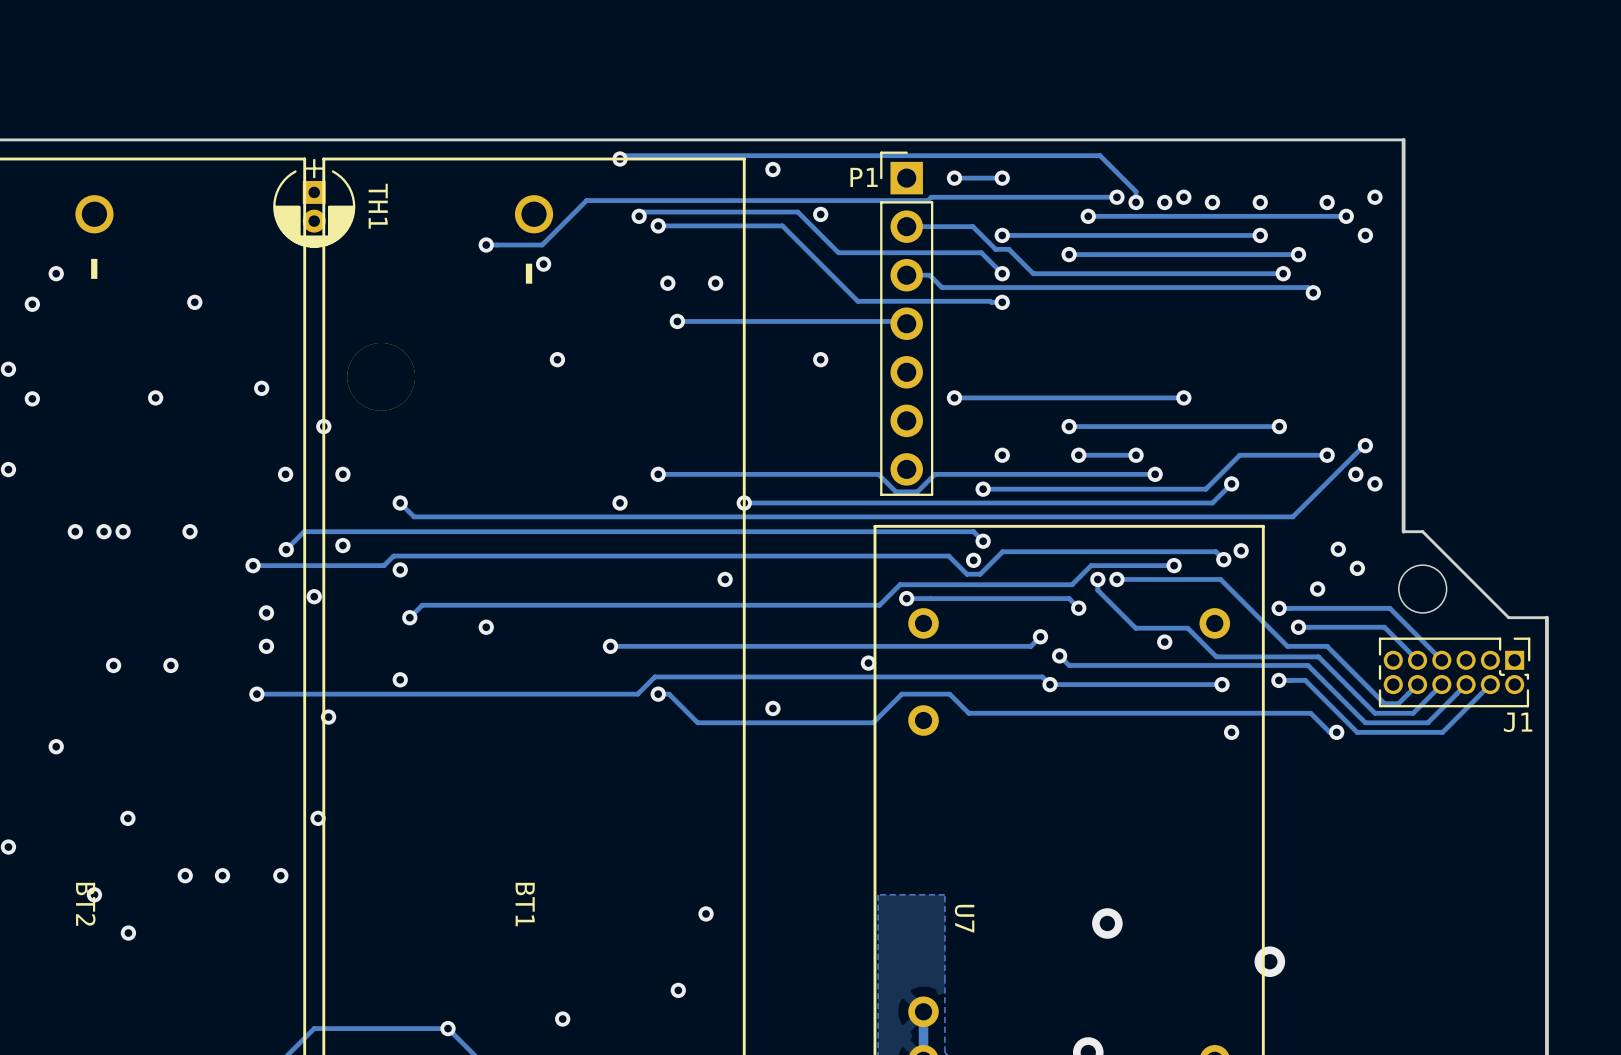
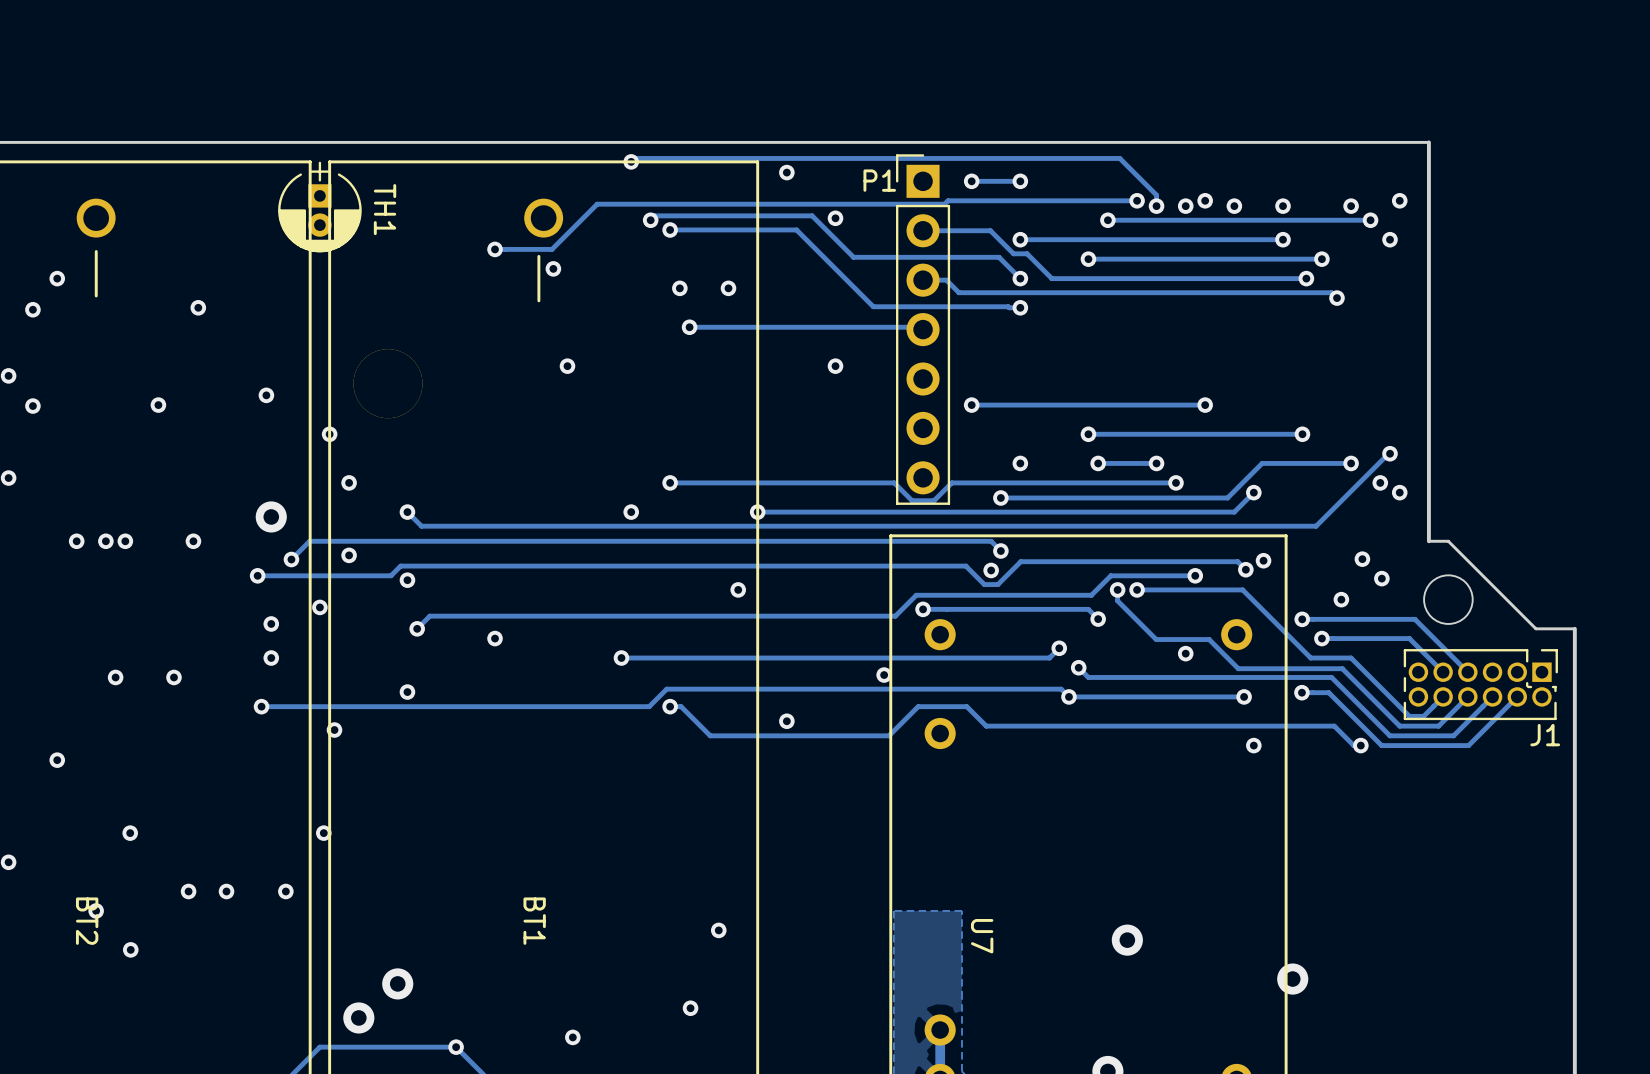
via: (285, 474) -> none
via: none -> (271, 516)
via: none -> (397, 983)
via: none -> (358, 1017)

